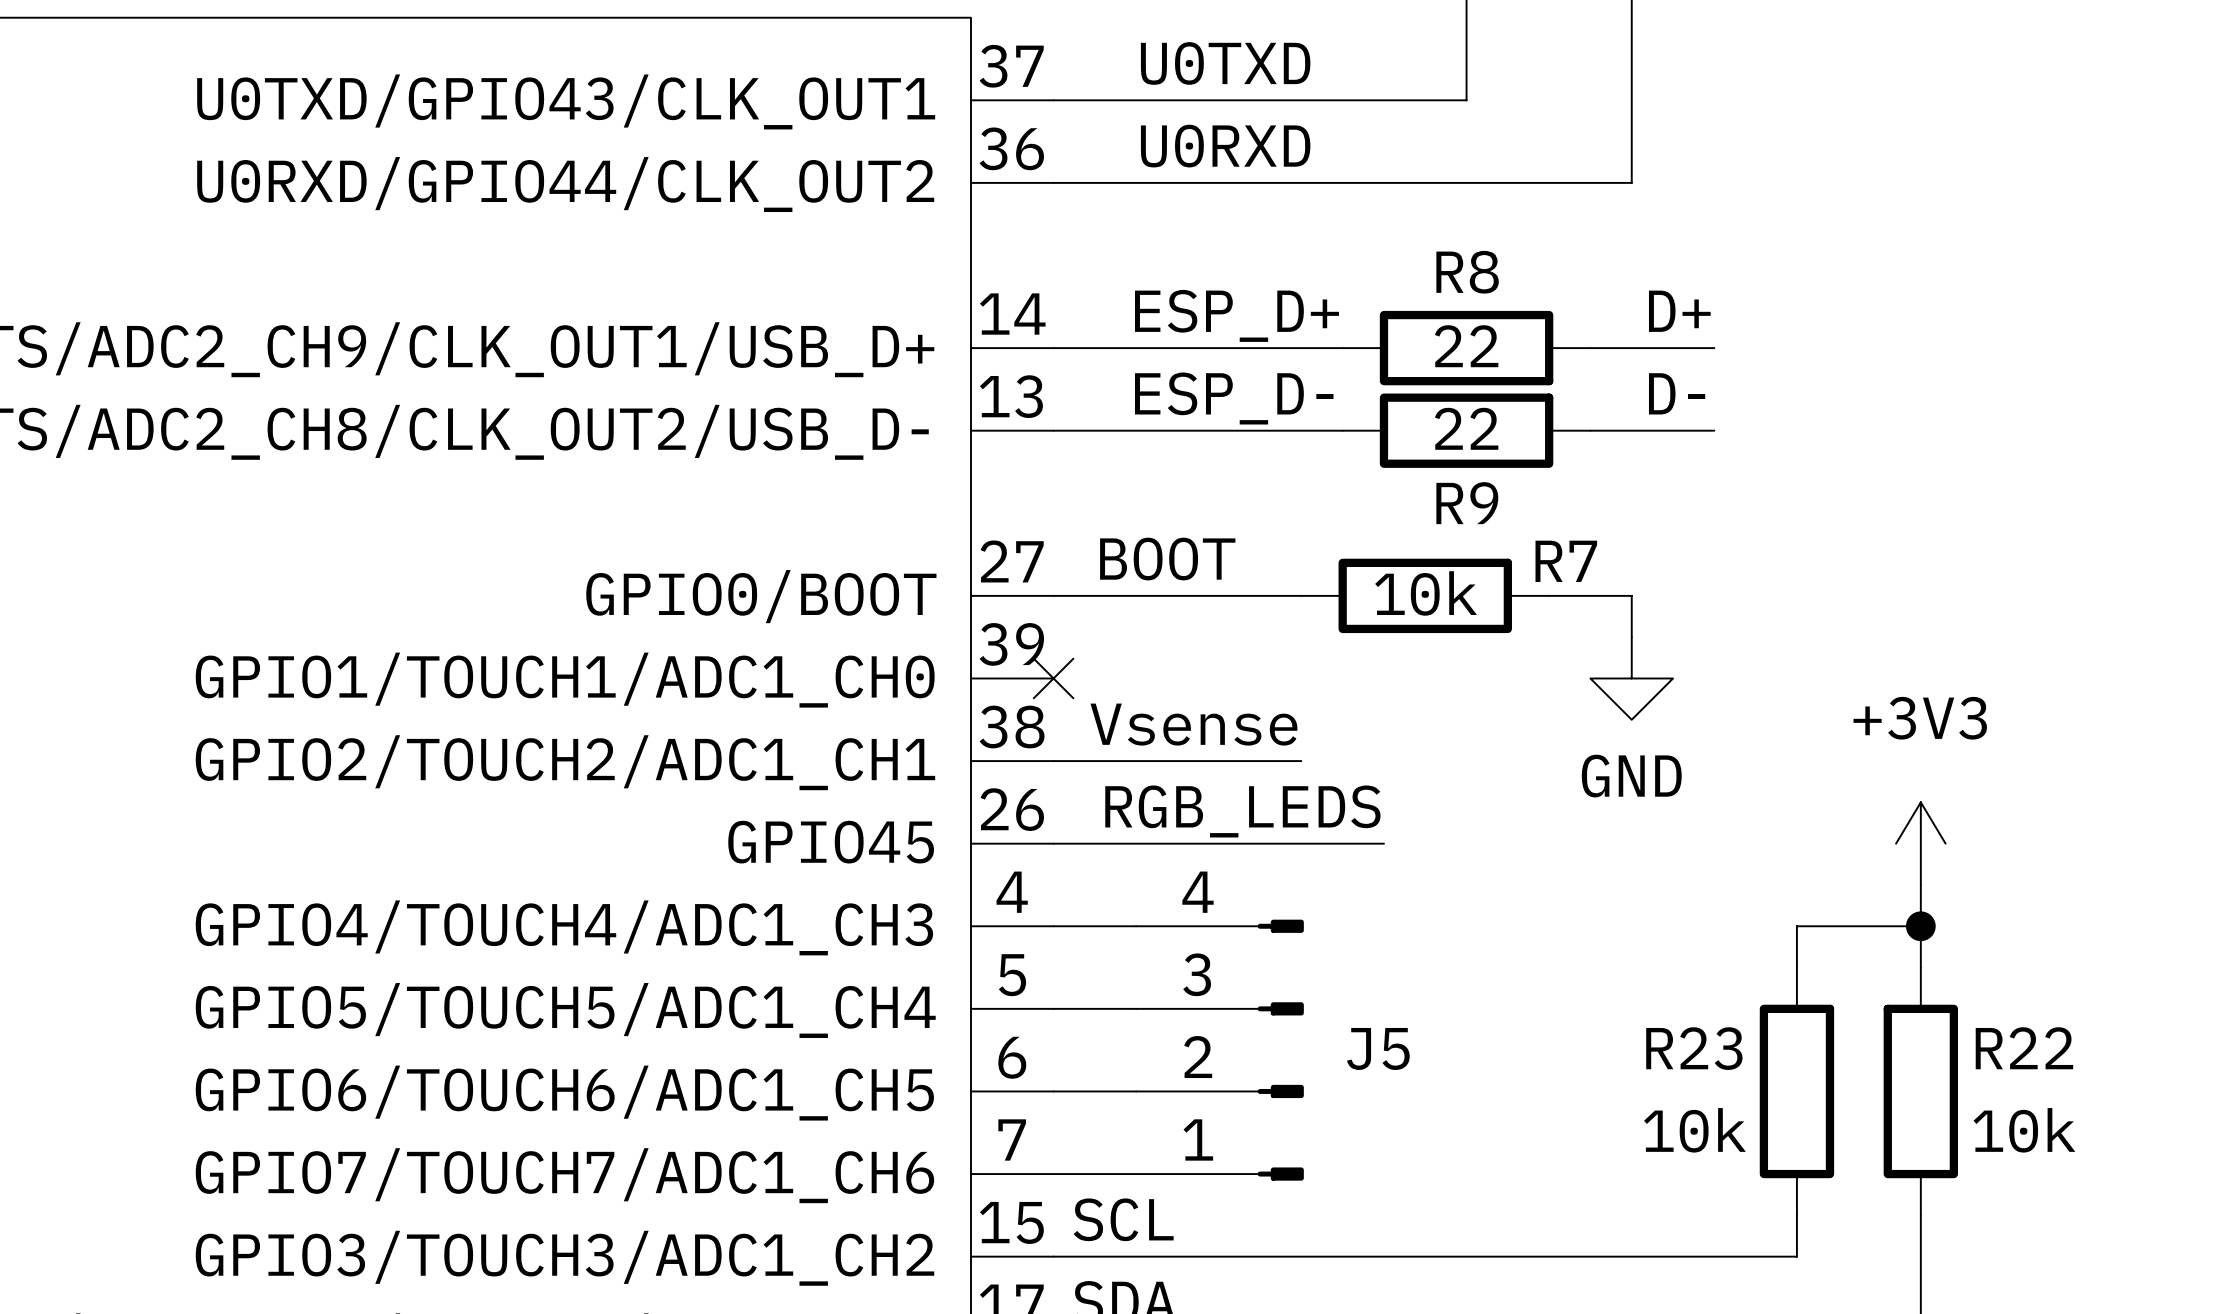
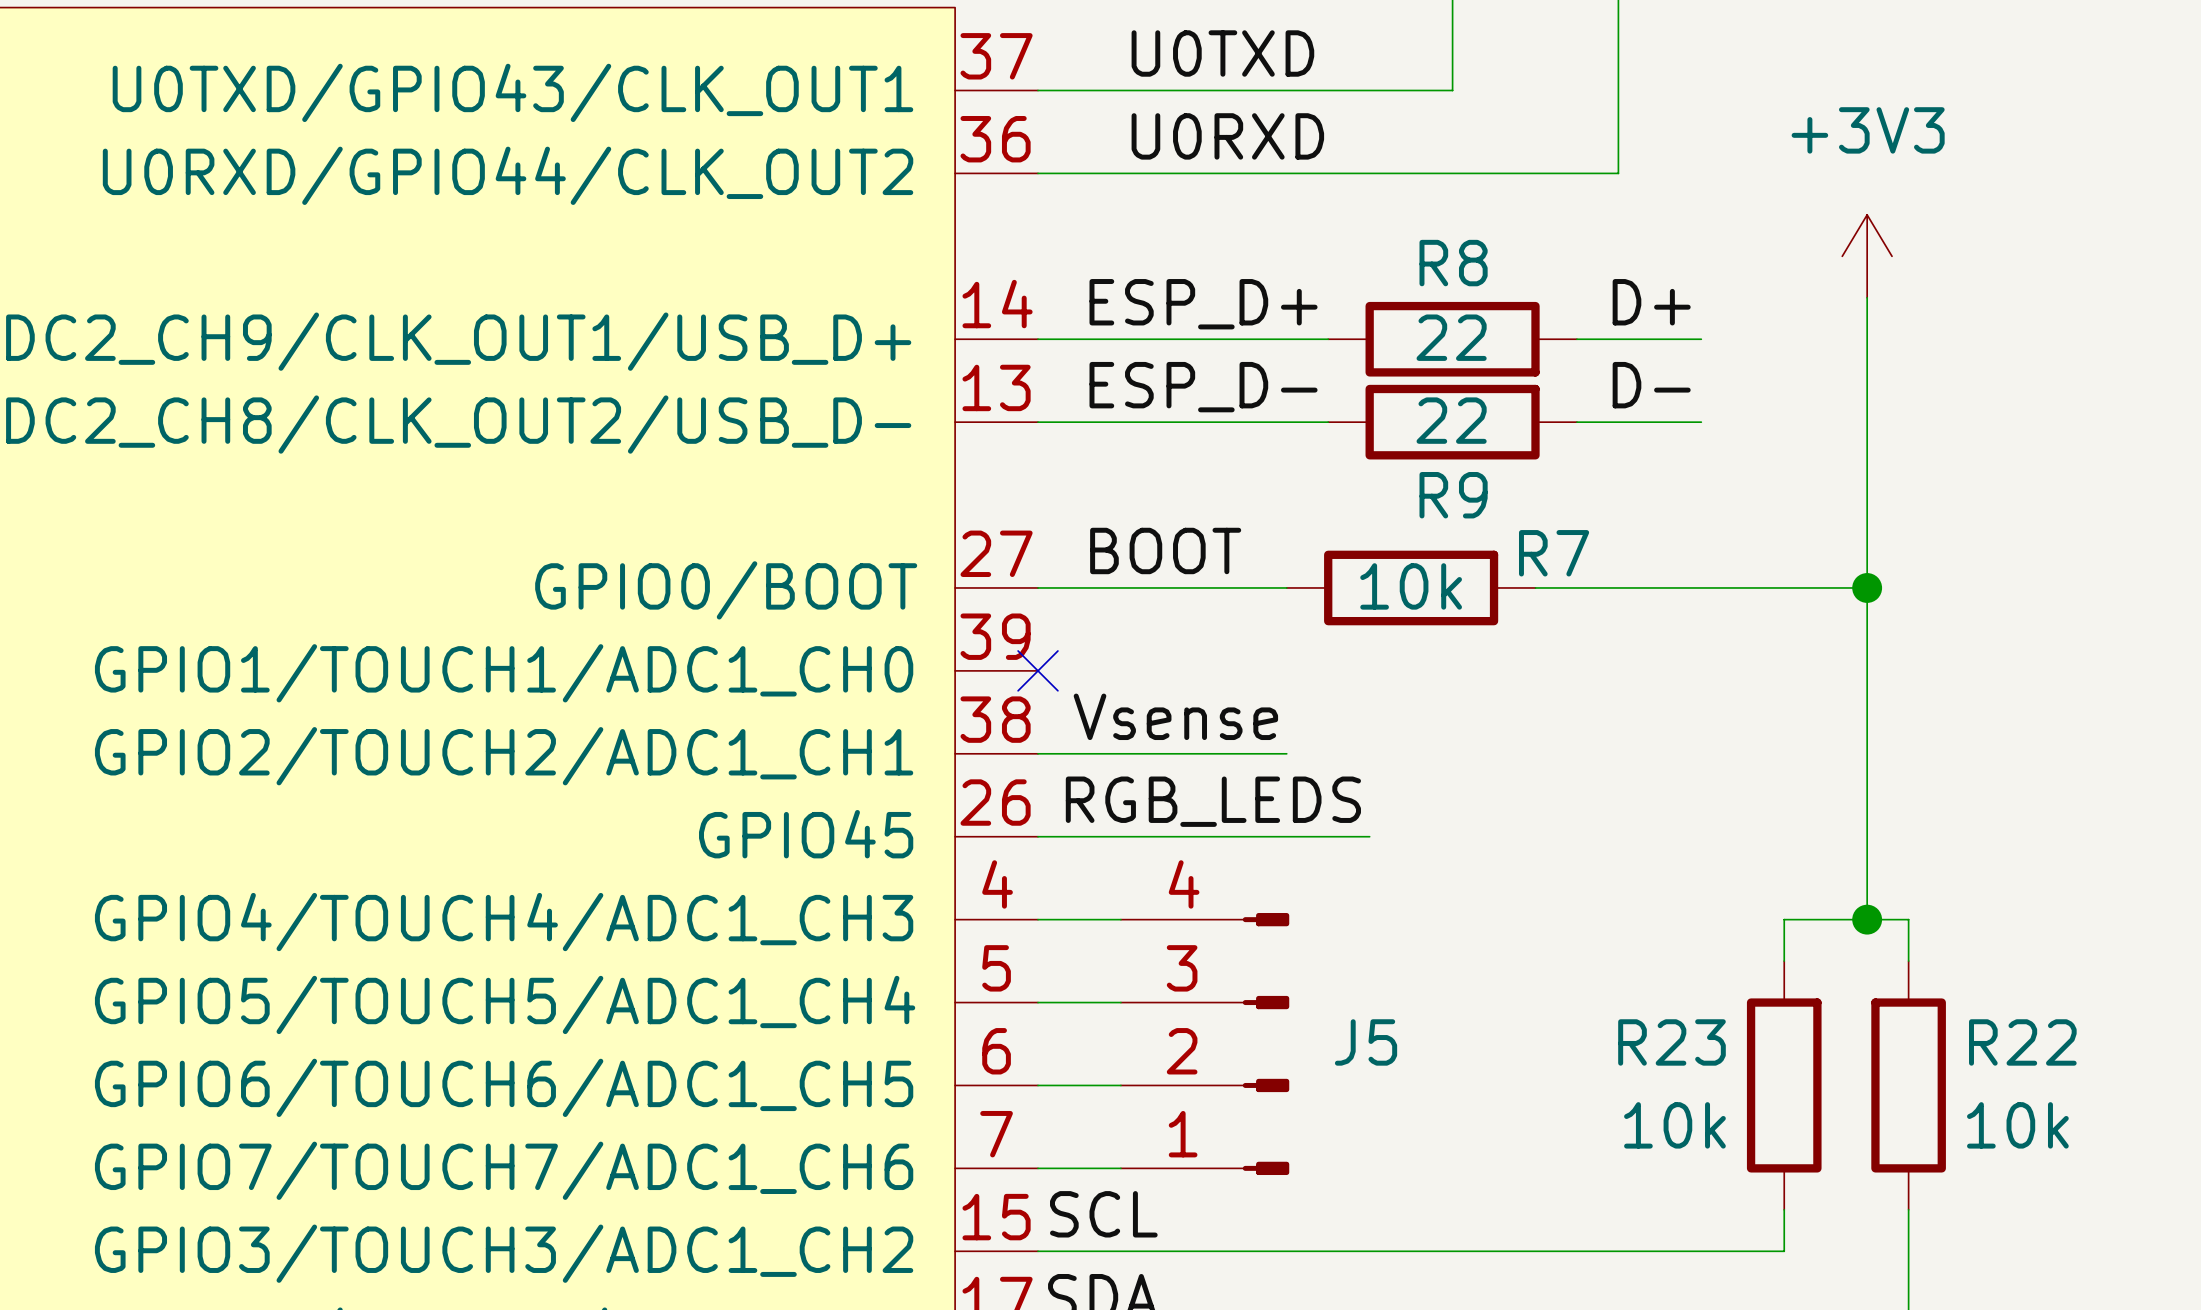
wire: none -> (1867, 297) (1867, 919)
wire: (1631, 595) (1631, 637) -> (1618, 587) (1867, 587)
junction: none -> (1867, 587)
power symbol: GND (1631, 678) -> none
power symbol position: +3V3 (1920, 843) -> +3V3 (1867, 256)
wire: (1920, 884) (1920, 926) -> none
junction position: (1920, 926) -> (1867, 919)

